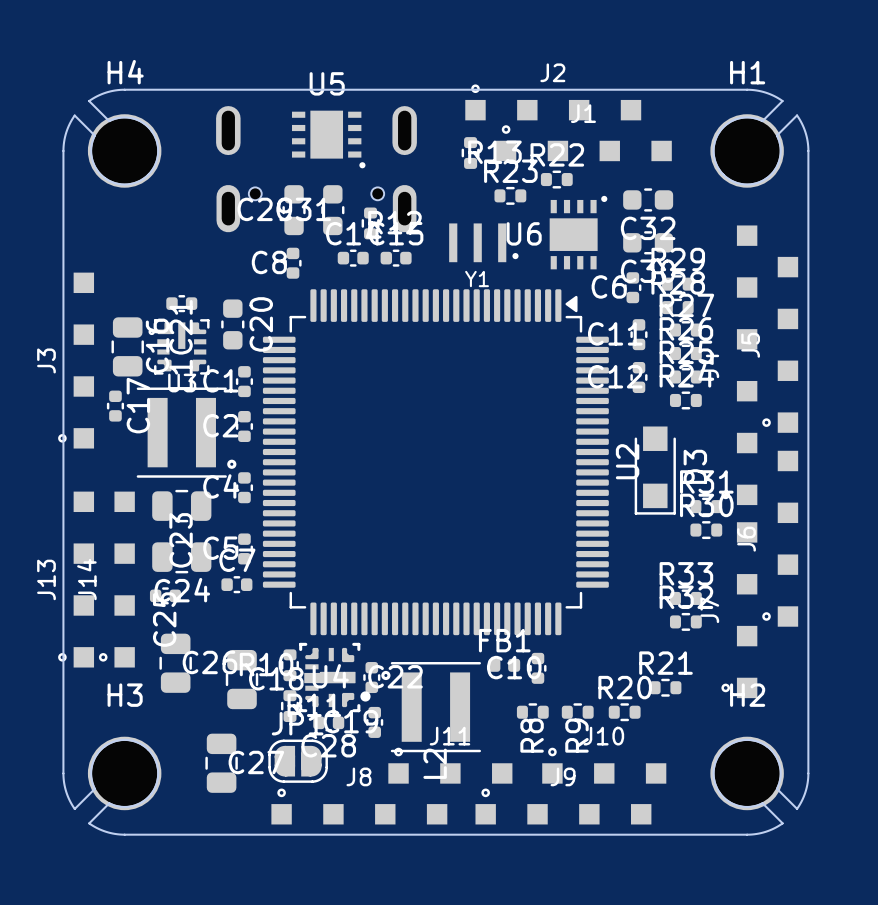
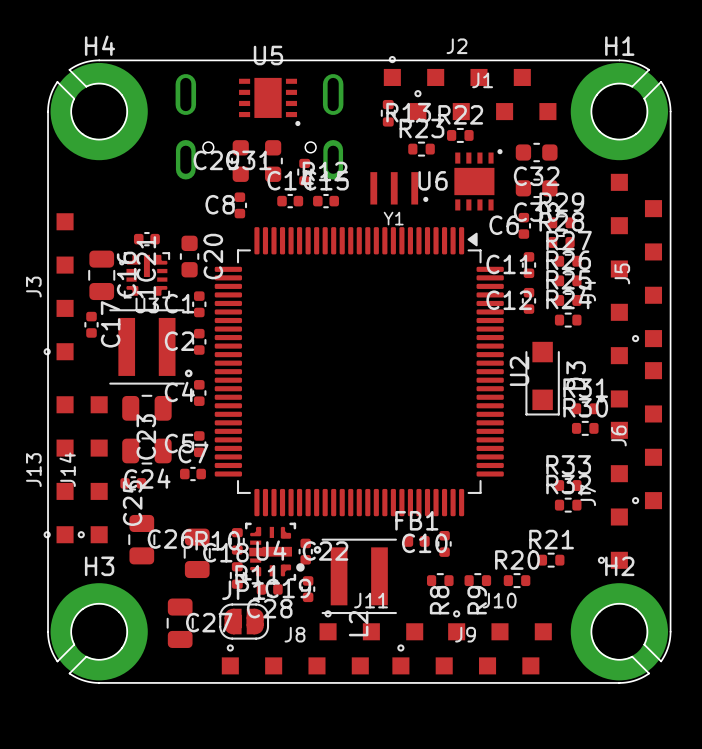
H4 footprint: [87, 114, 162, 188] -> [50, 62, 148, 161]
H1 footprint: [710, 114, 784, 188] -> [570, 62, 668, 161]
H3 footprint: [87, 736, 162, 811] -> [50, 583, 148, 681]
H2 footprint: [710, 736, 784, 811] -> [570, 583, 668, 681]

